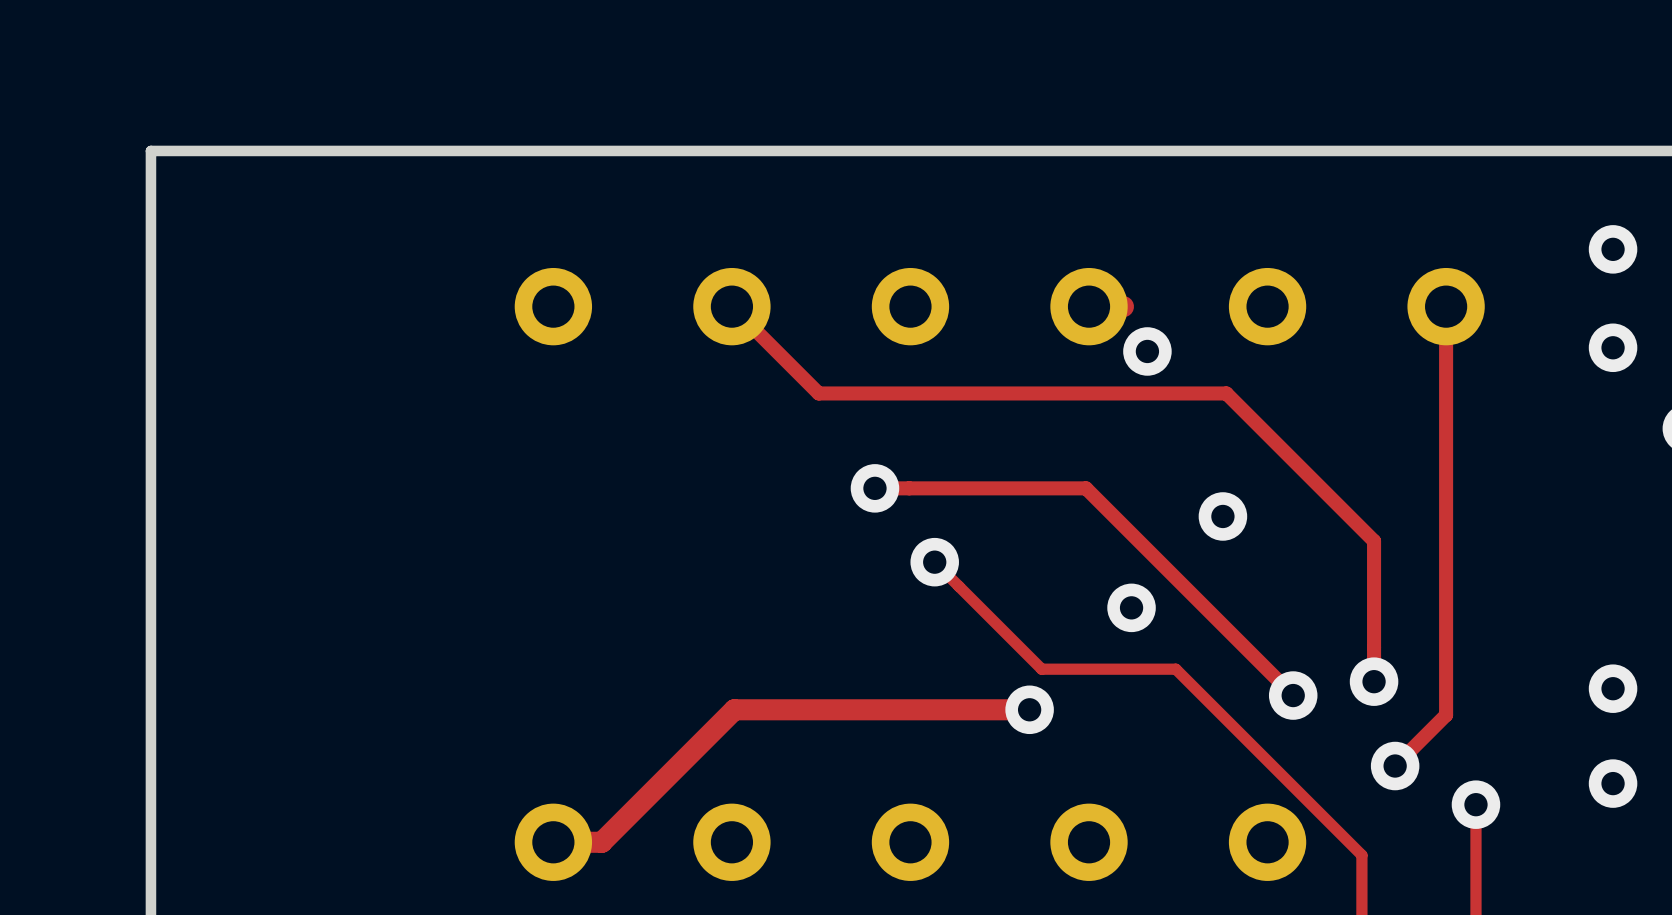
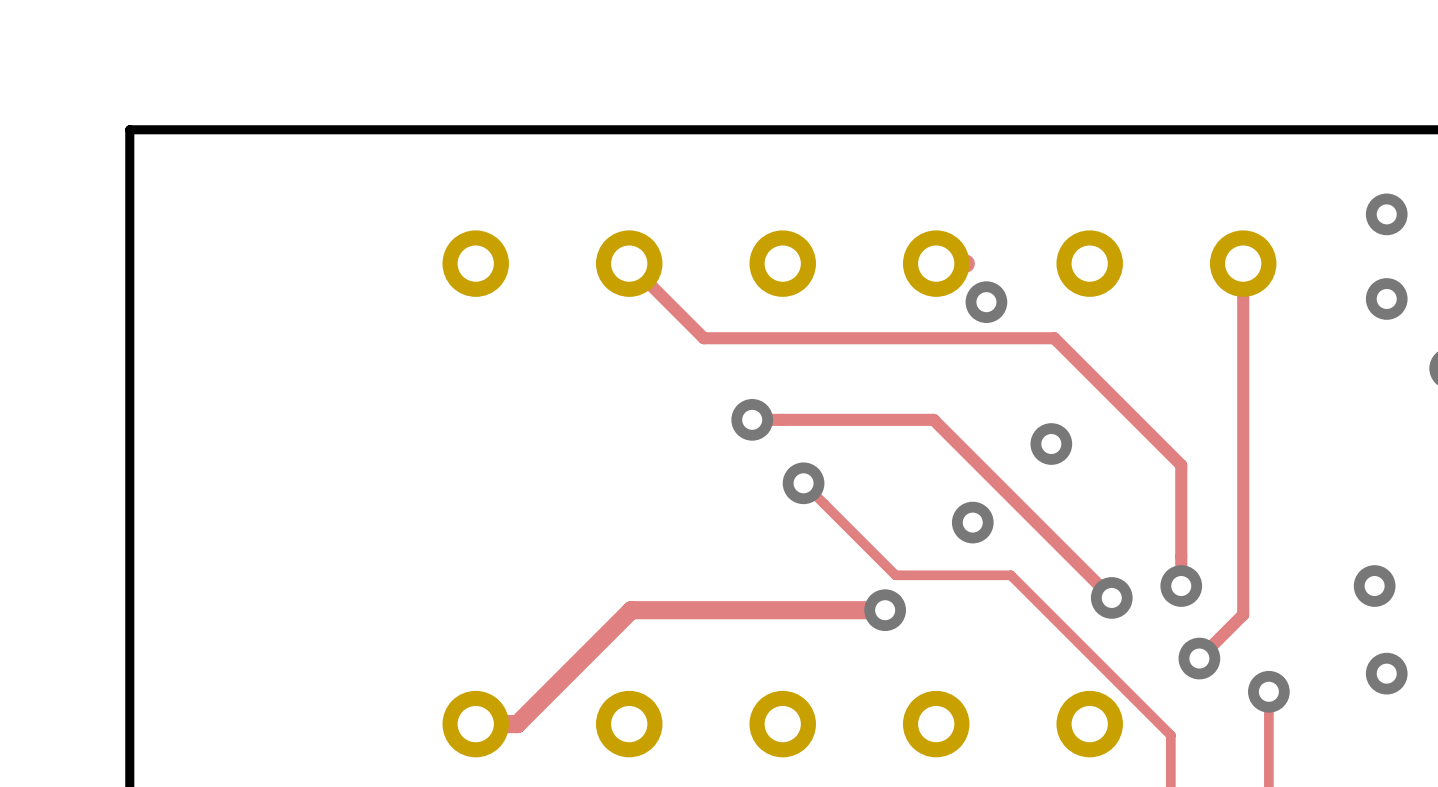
via position: (1613, 688) -> (1374, 586)

